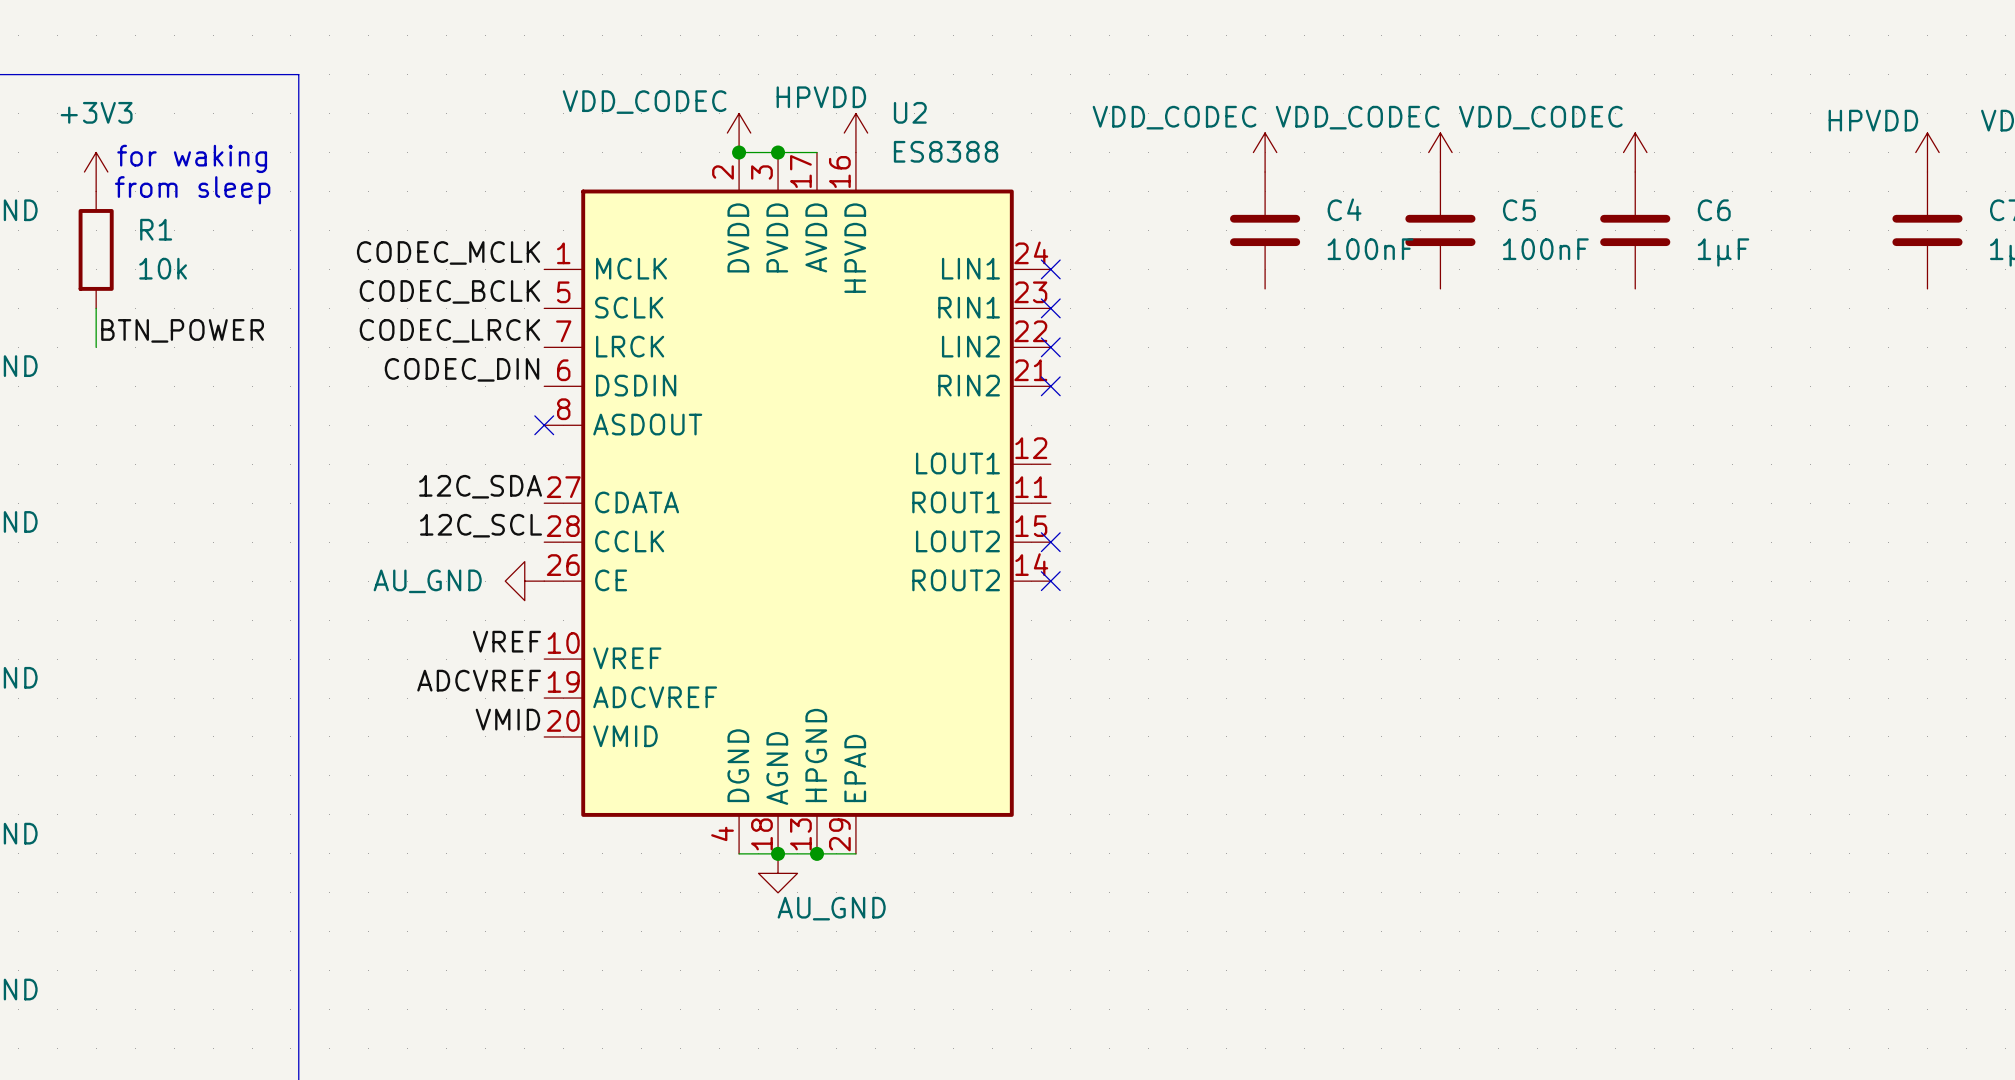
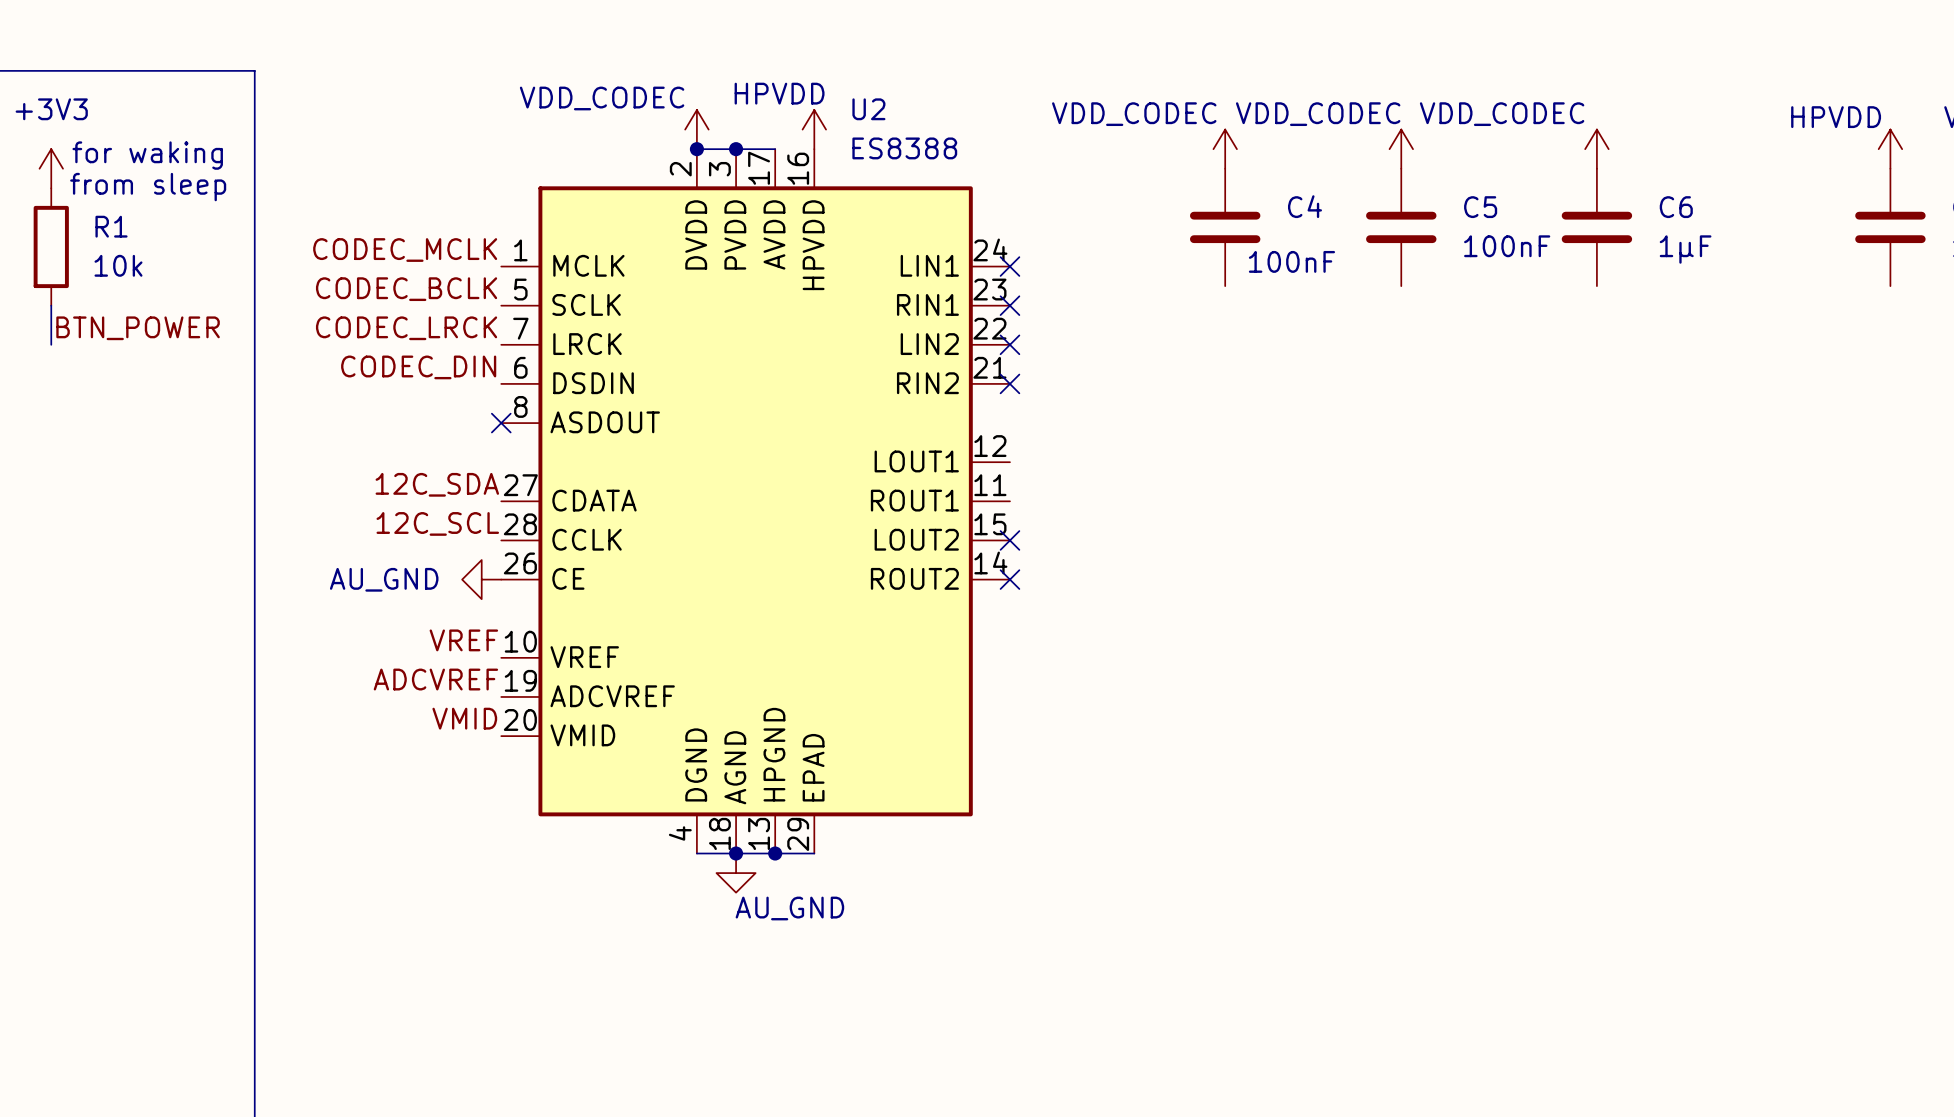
C4 value position: 100nF (1370, 249) -> 100nF (1291, 261)

